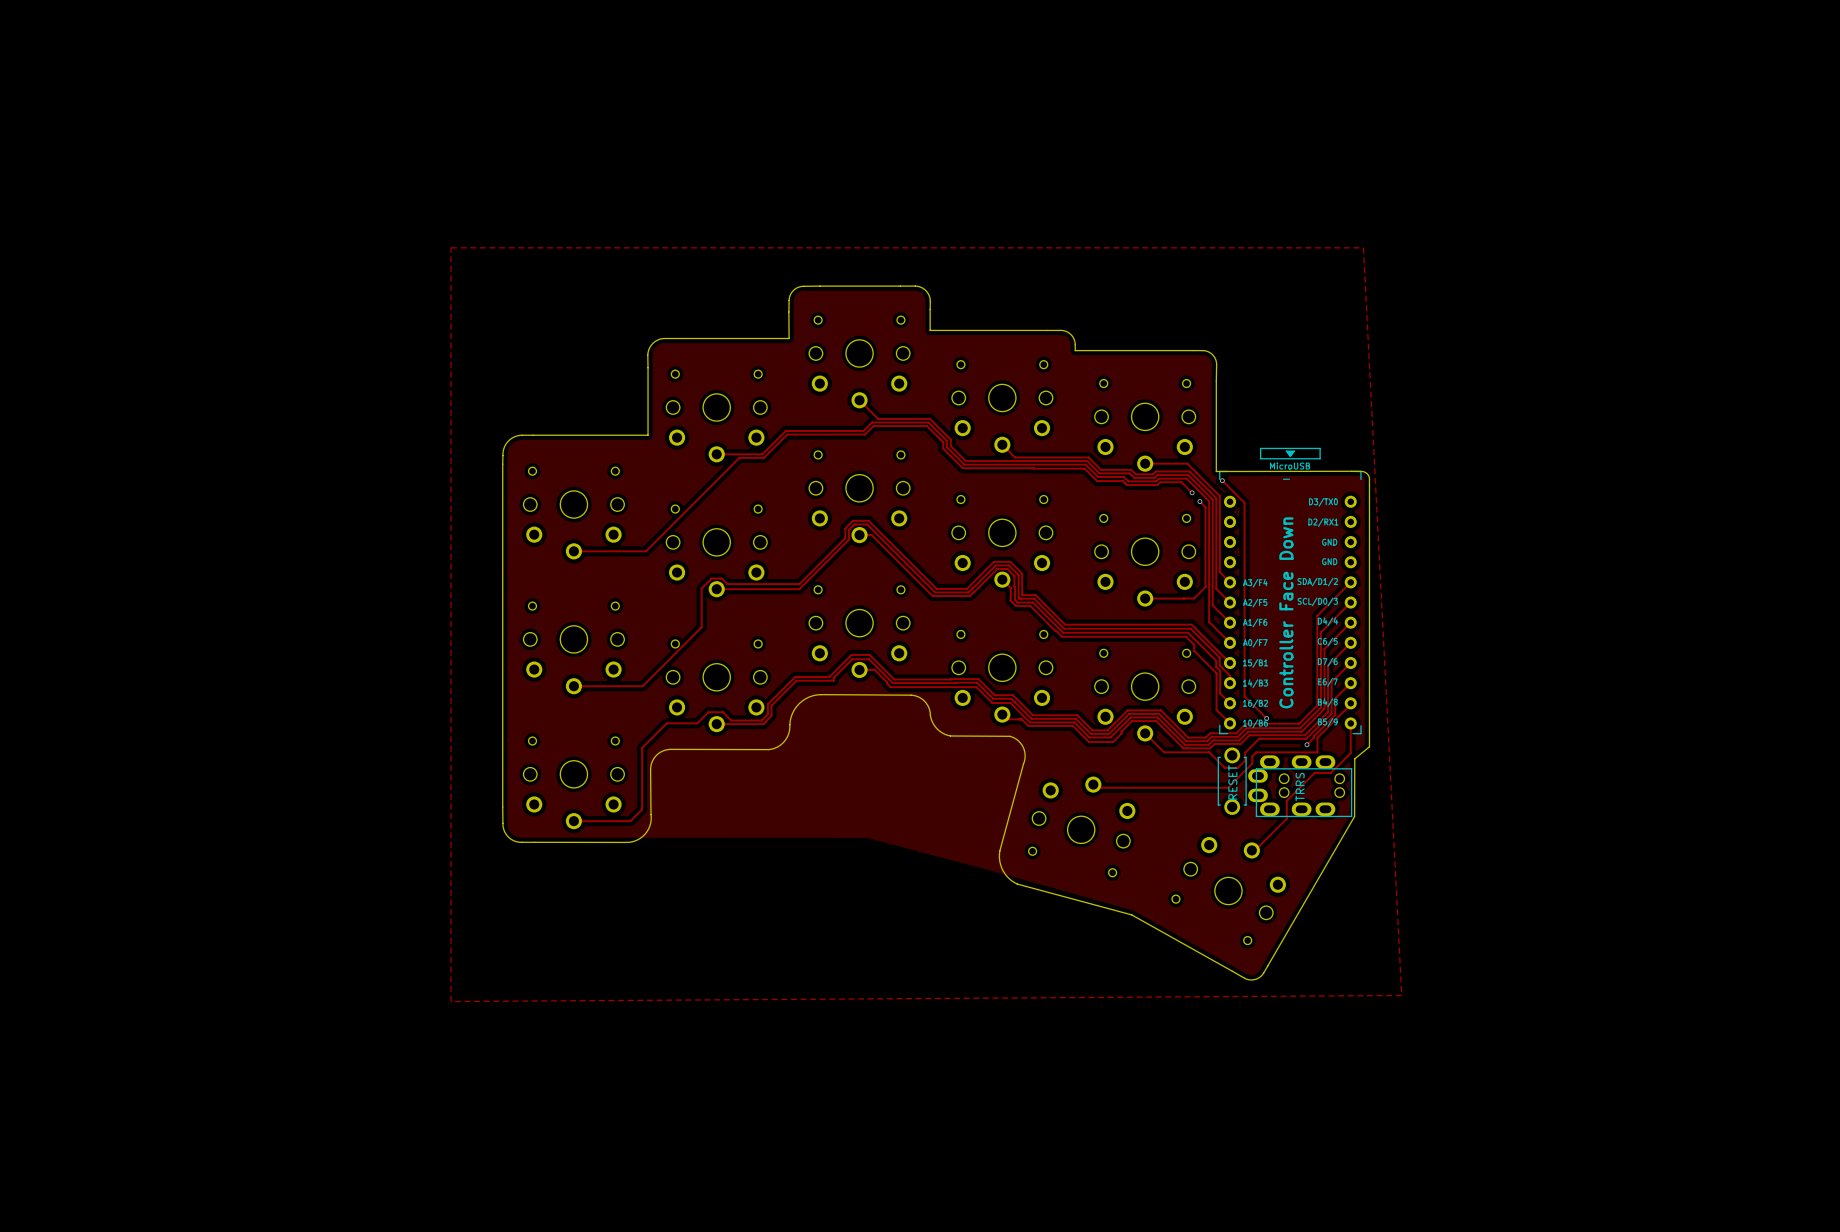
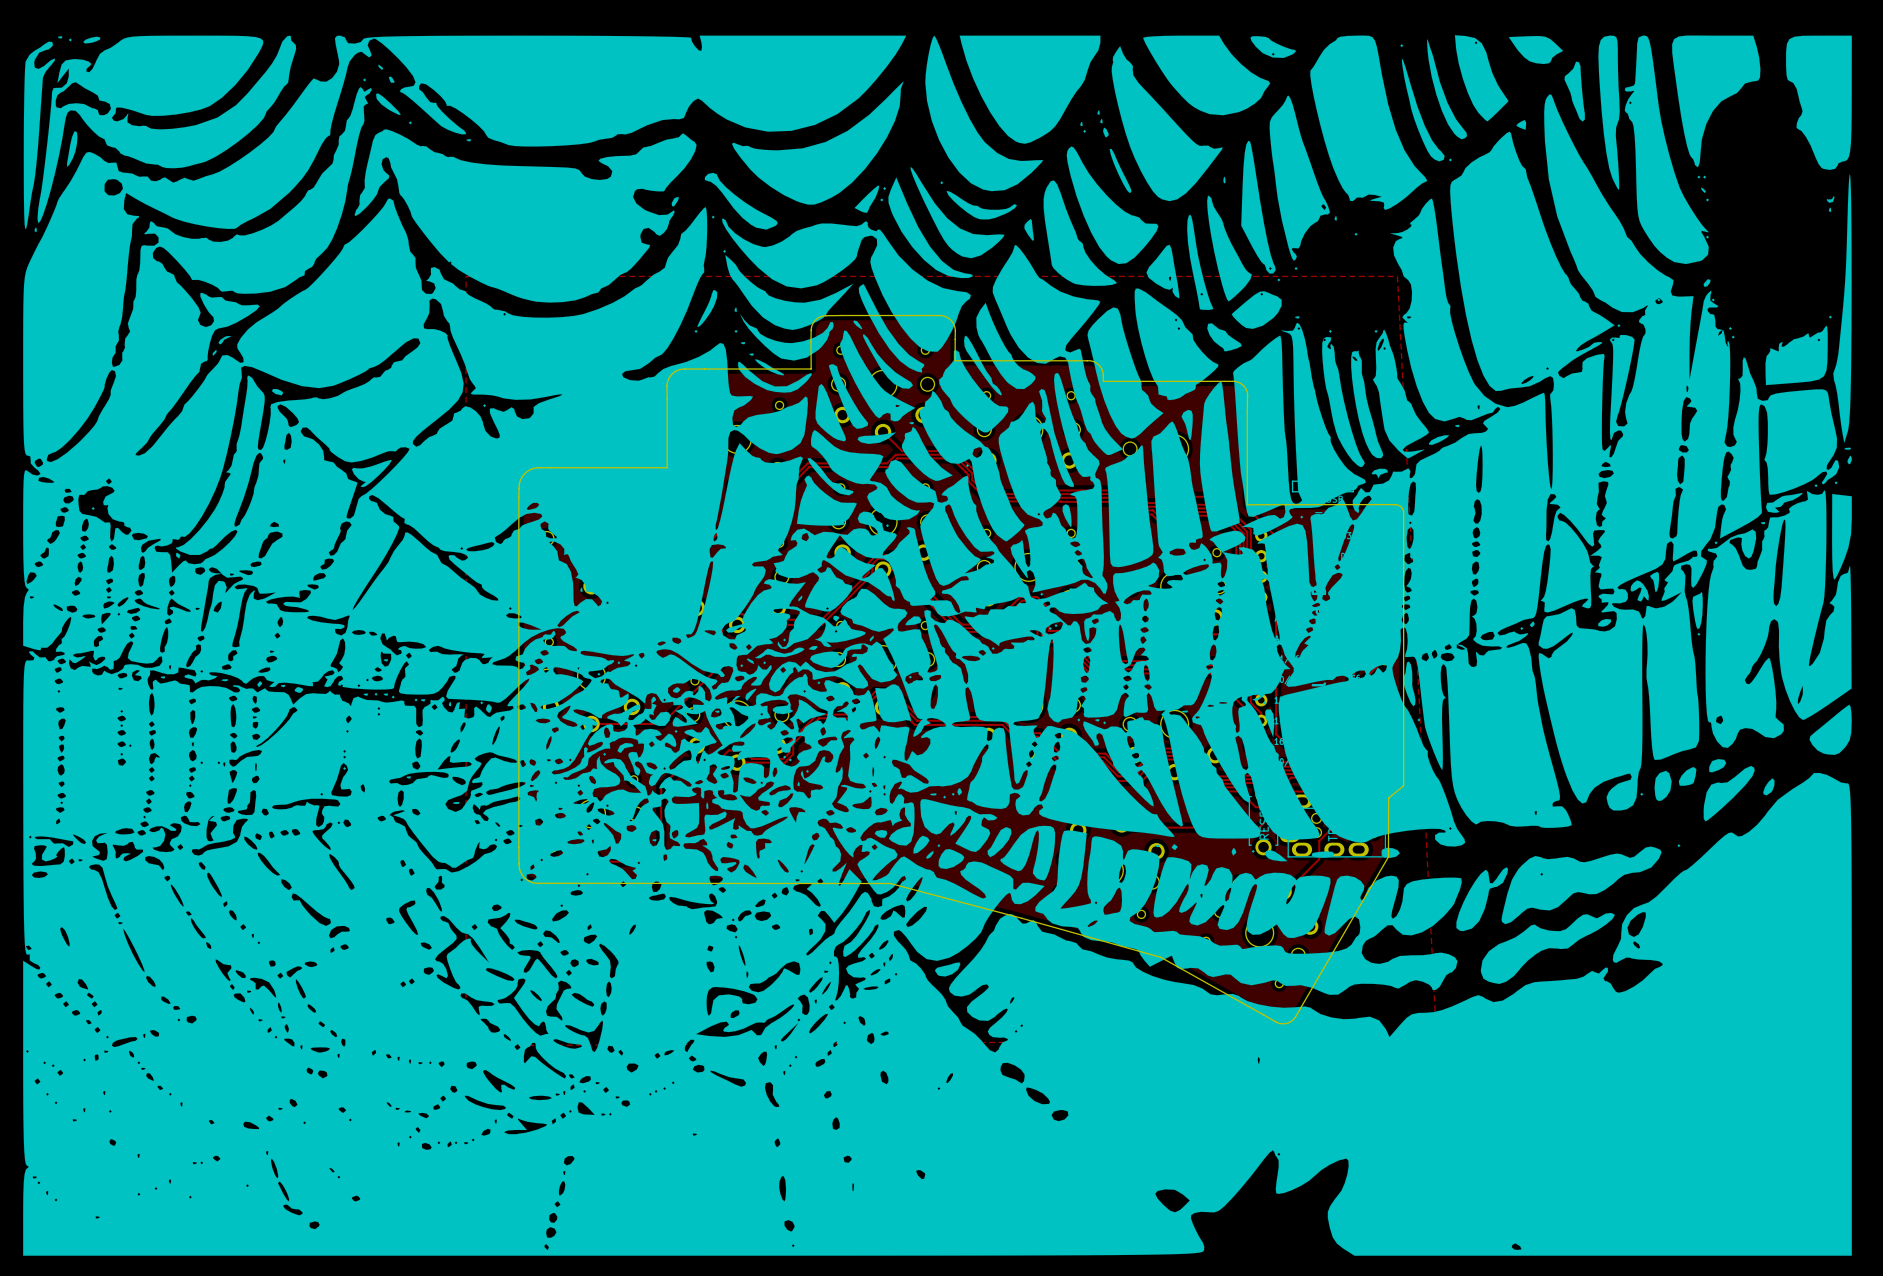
drawing: none -> [23, 35, 1852, 1256]
board edge: (534, 842) (626, 842) (640, 838) (646, 831) (651, 820) (651, 764) (656, 755) (663, 750) (771, 749) (780, 745) (786, 738) (794, 709) (809, 696) (821, 694) (913, 695) (926, 703) (933, 724) (944, 734) (950, 735) (1009, 736) (1016, 739) (1023, 747) (1024, 759) (999, 854) (1001, 867) (1008, 878) (1017, 884) (1131, 914) -> (551, 883) (890, 883) (1160, 957)

